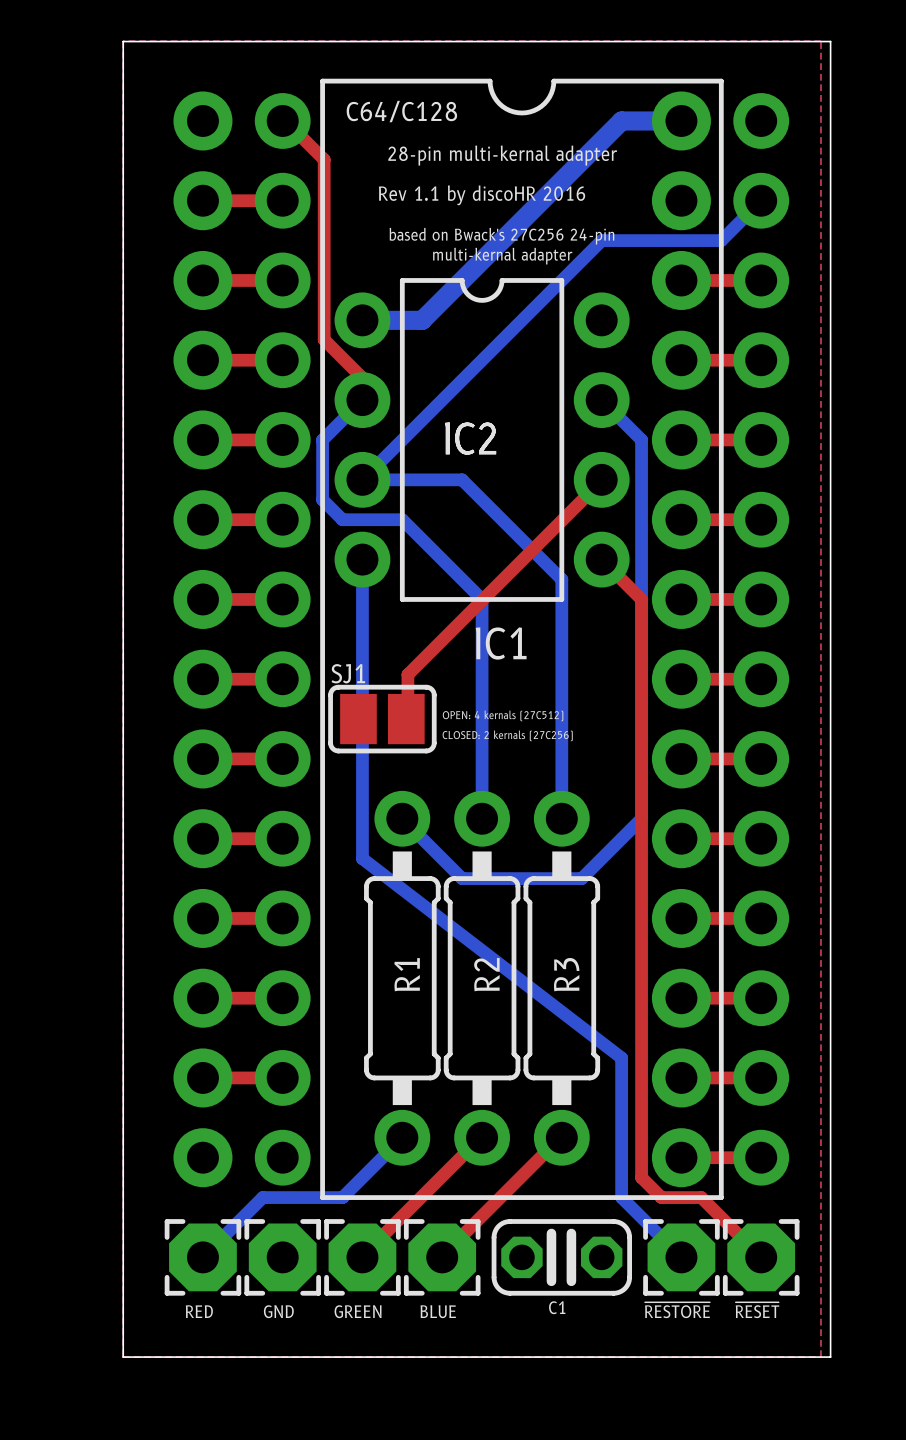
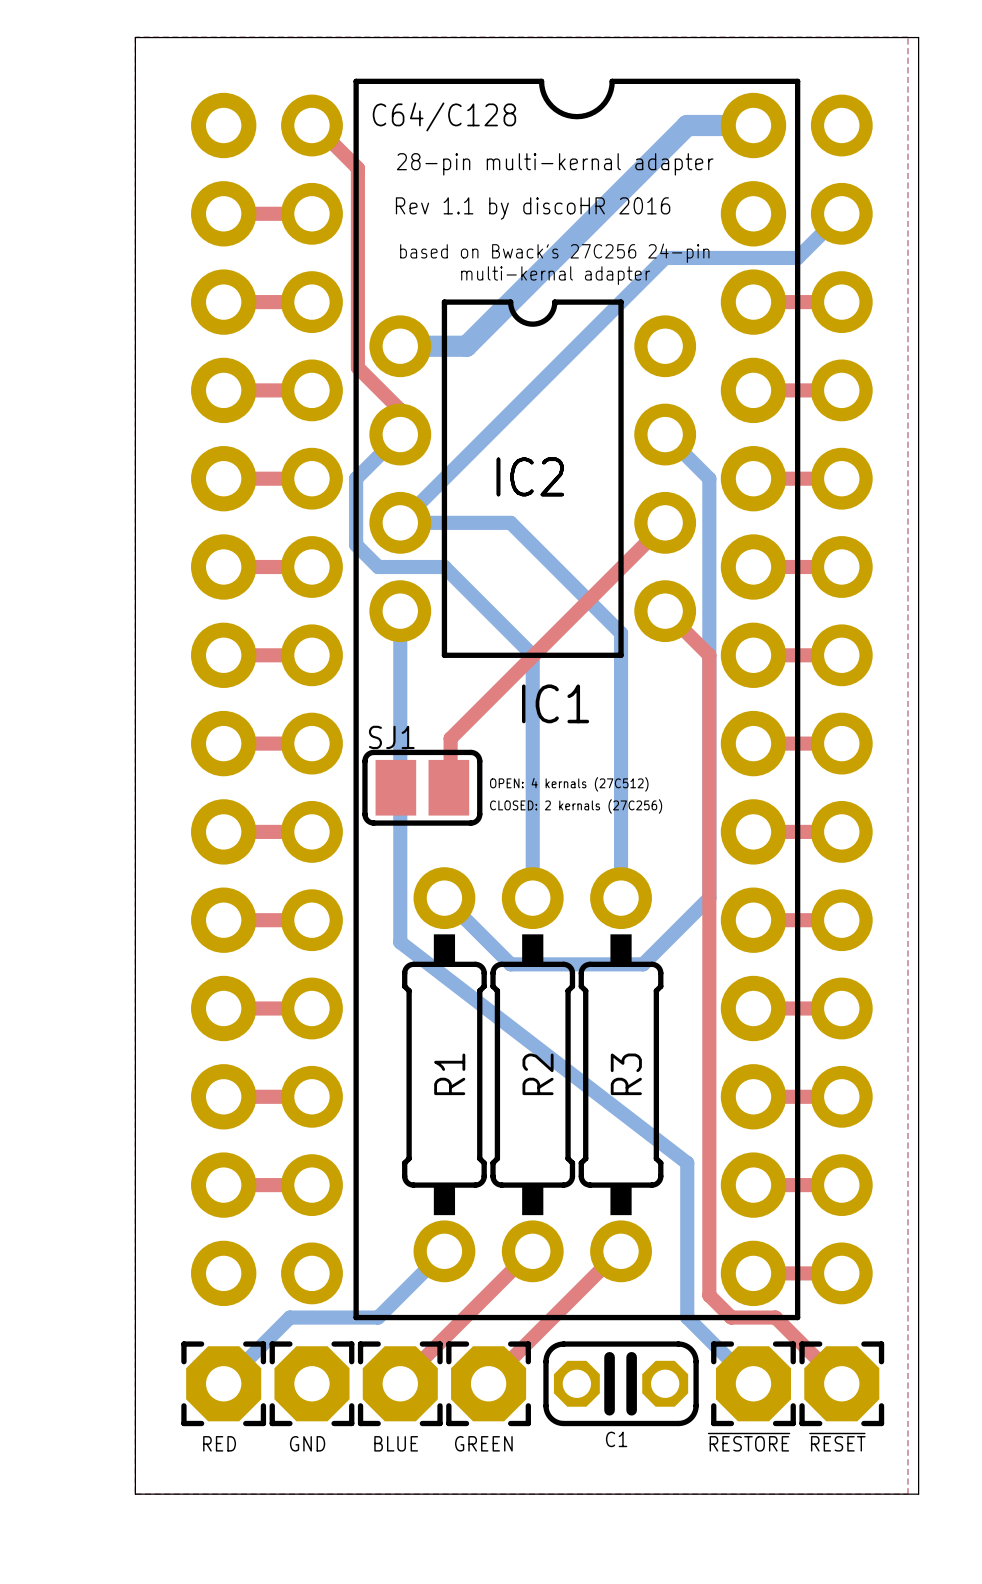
GREEN name: GREEN (358, 1311) -> BLUE (396, 1443)
BLUE name: BLUE (438, 1311) -> GREEN (483, 1443)

